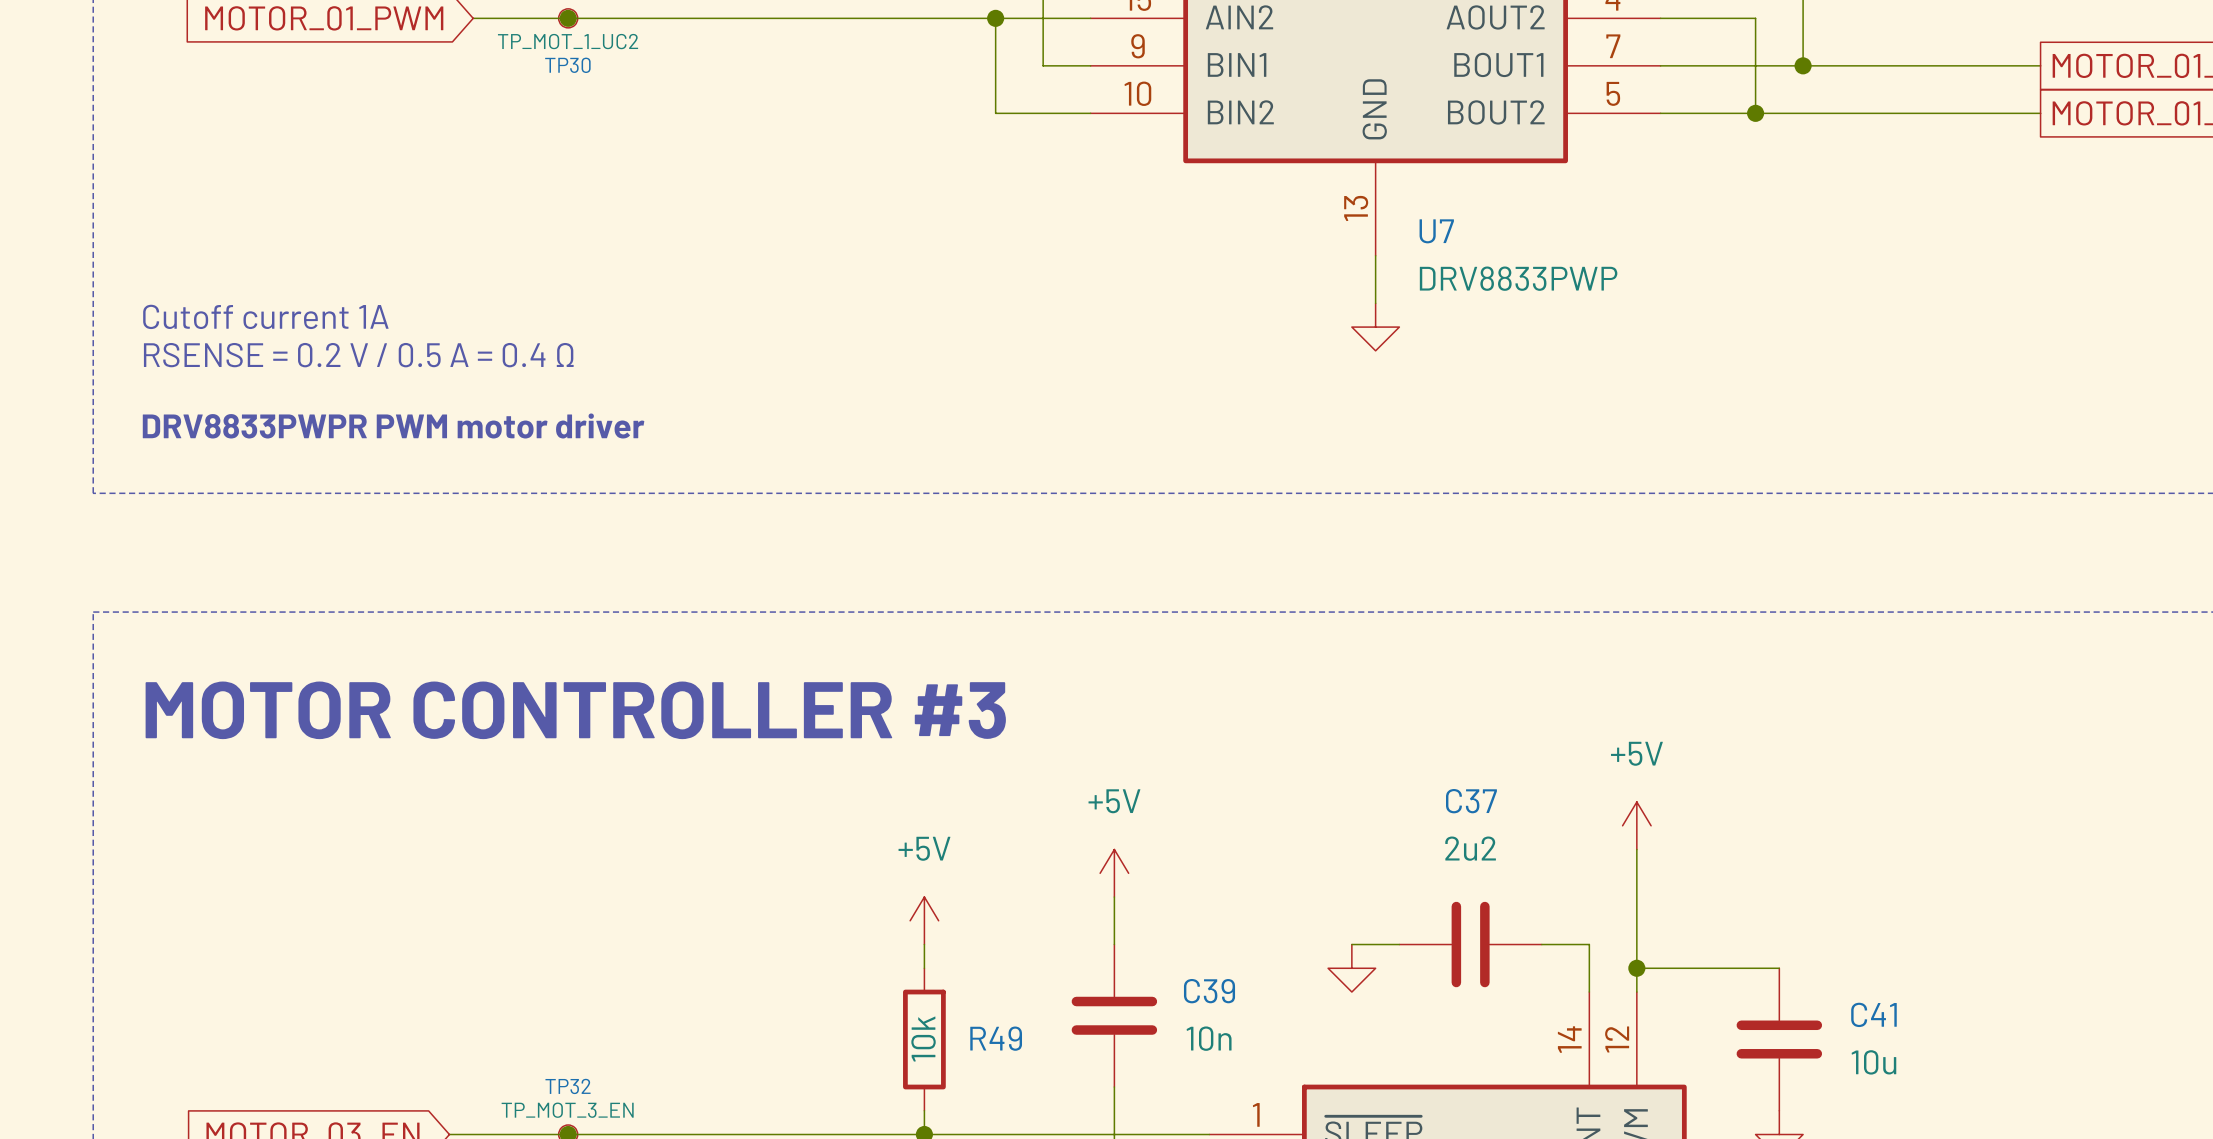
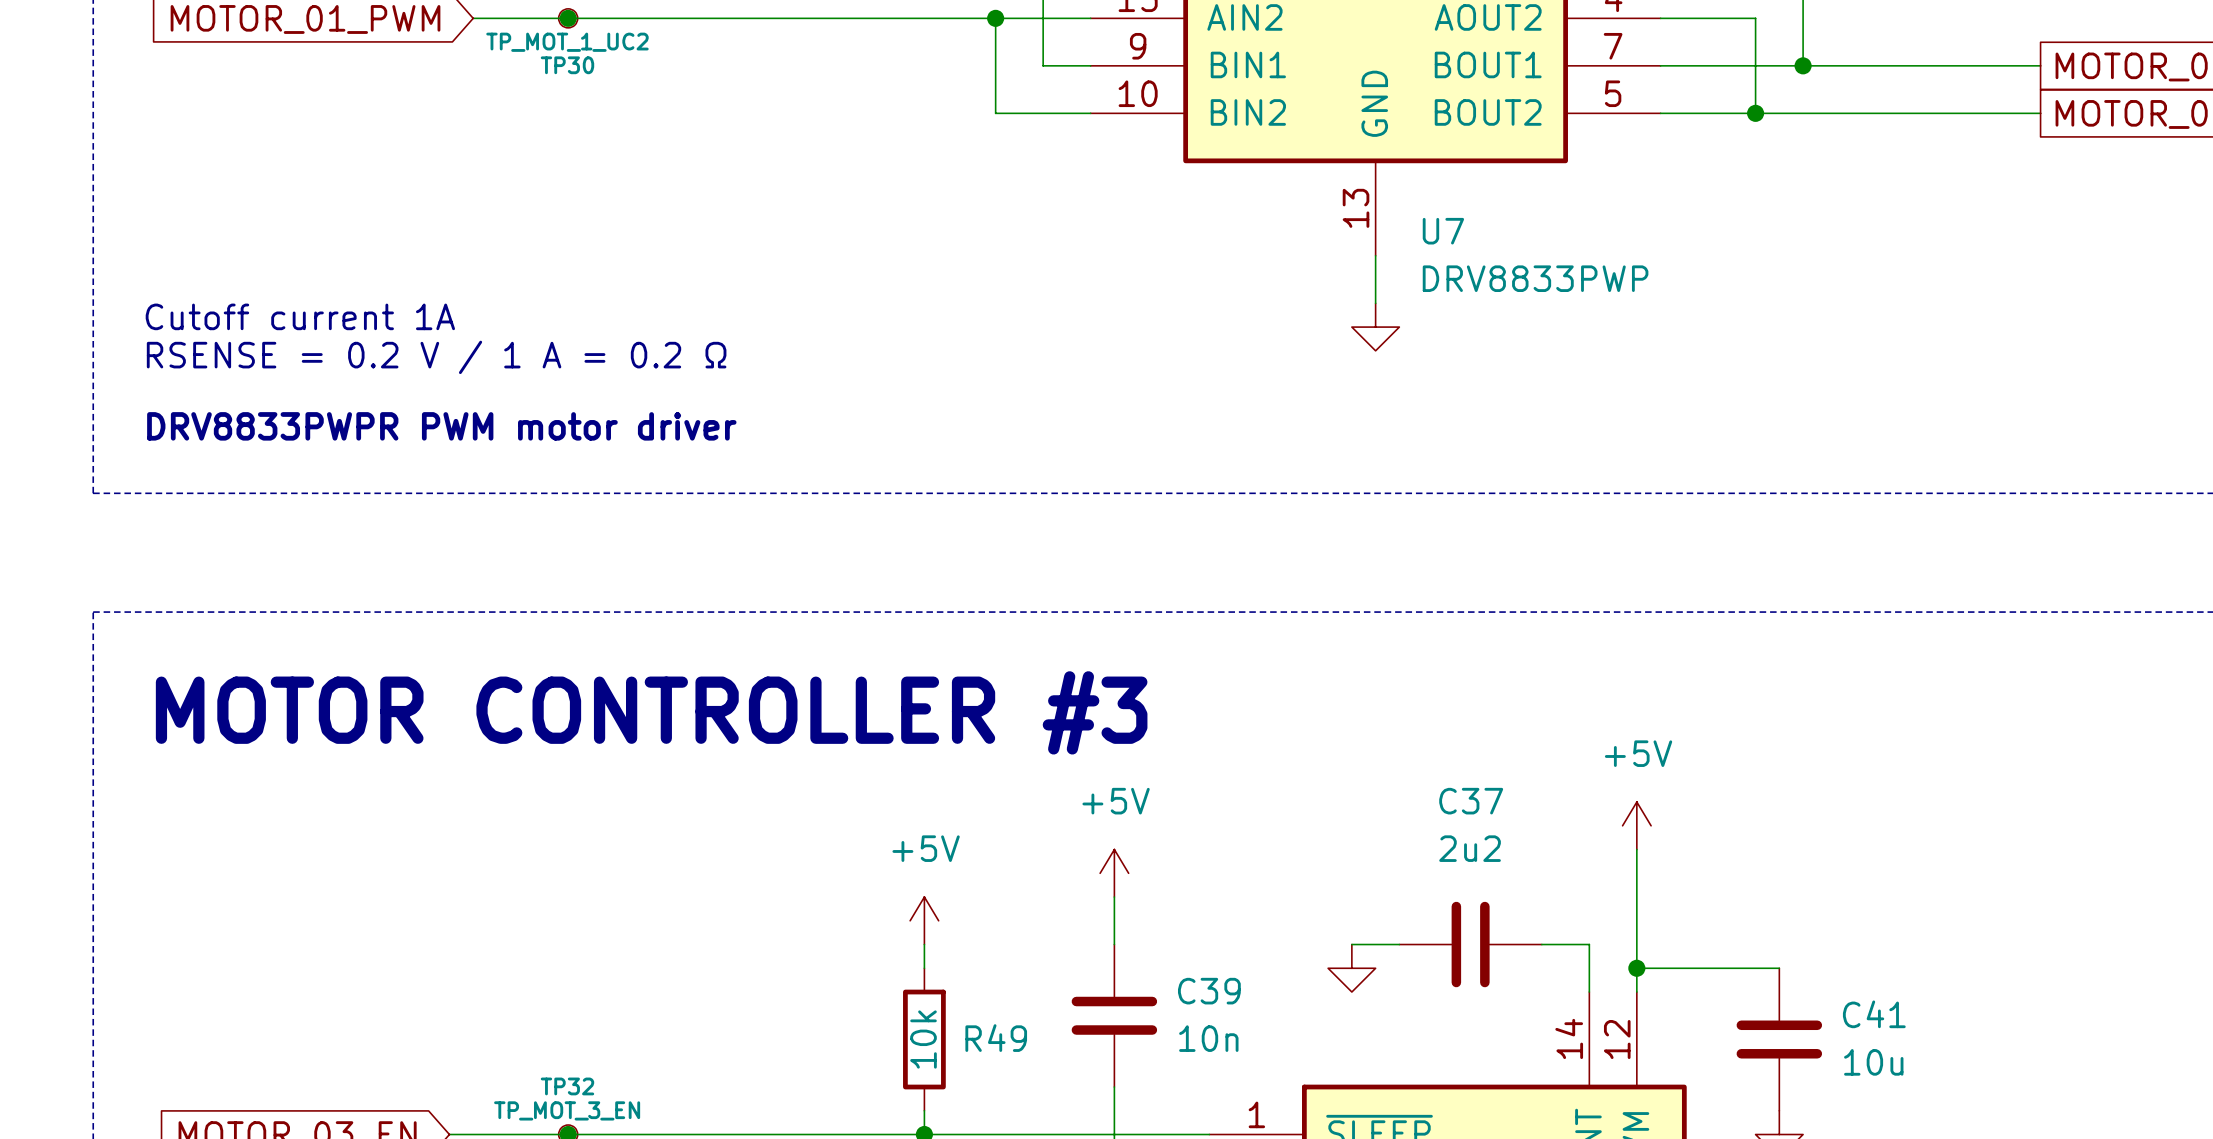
text: RSENSE = 0.2 V / 0.5 A = 0.4 Ω (358, 355) -> RSENSE = 0.2 V / 1 A = 0.2 Ω (436, 357)

